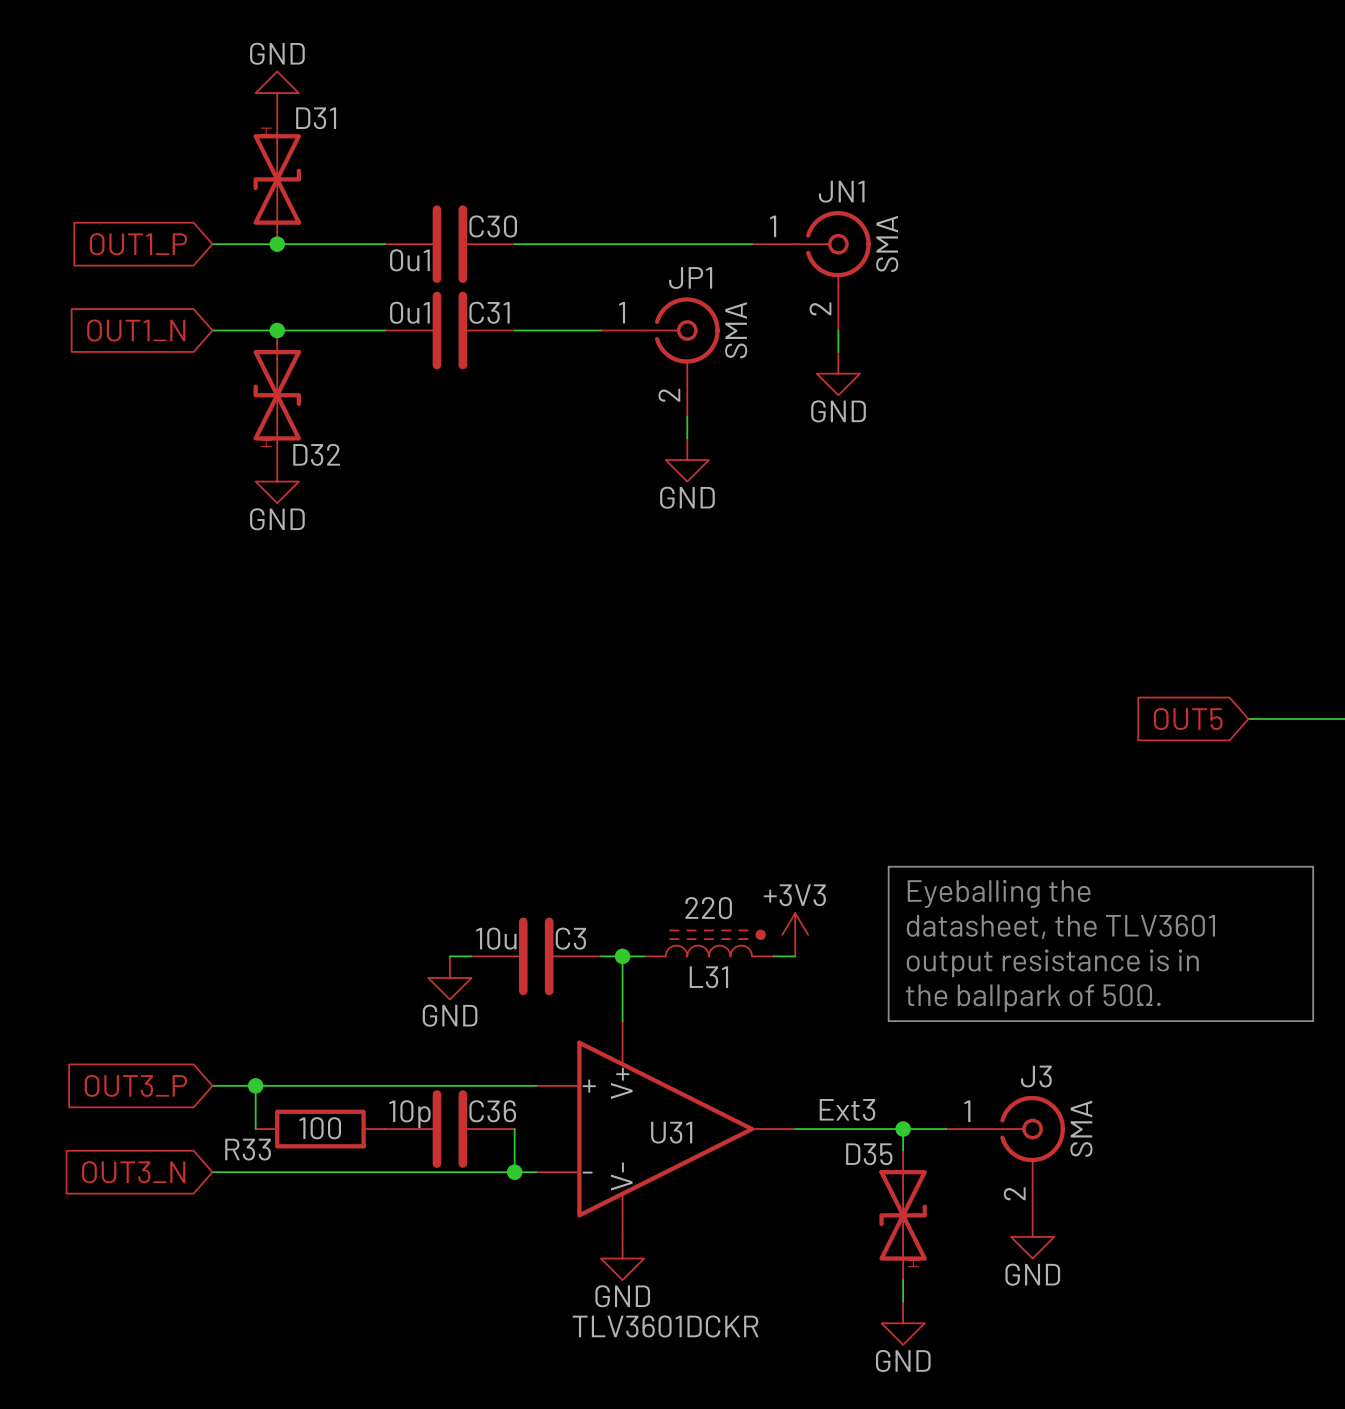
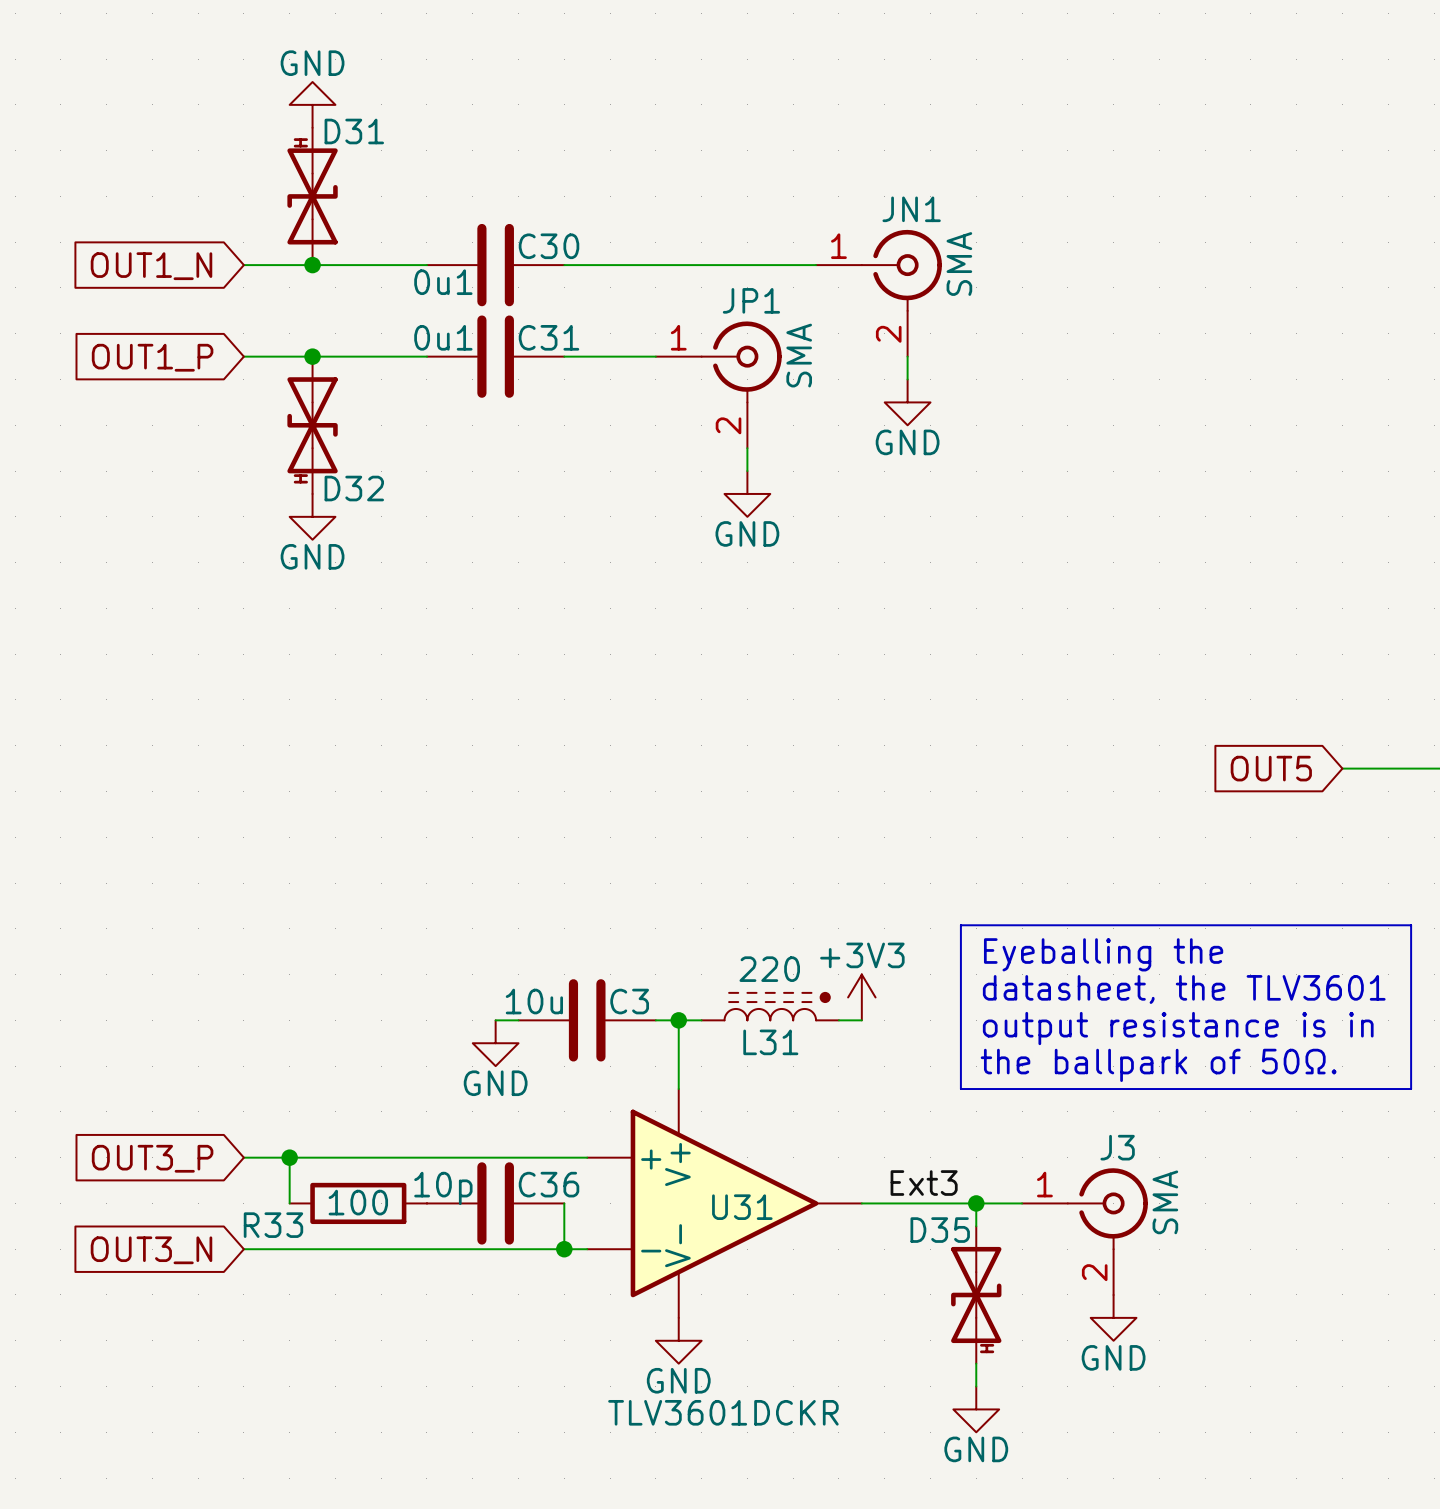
global label: OUT1_P (138, 244) -> OUT1_N (151, 266)
global label: OUT1_N (136, 330) -> OUT1_P (152, 357)

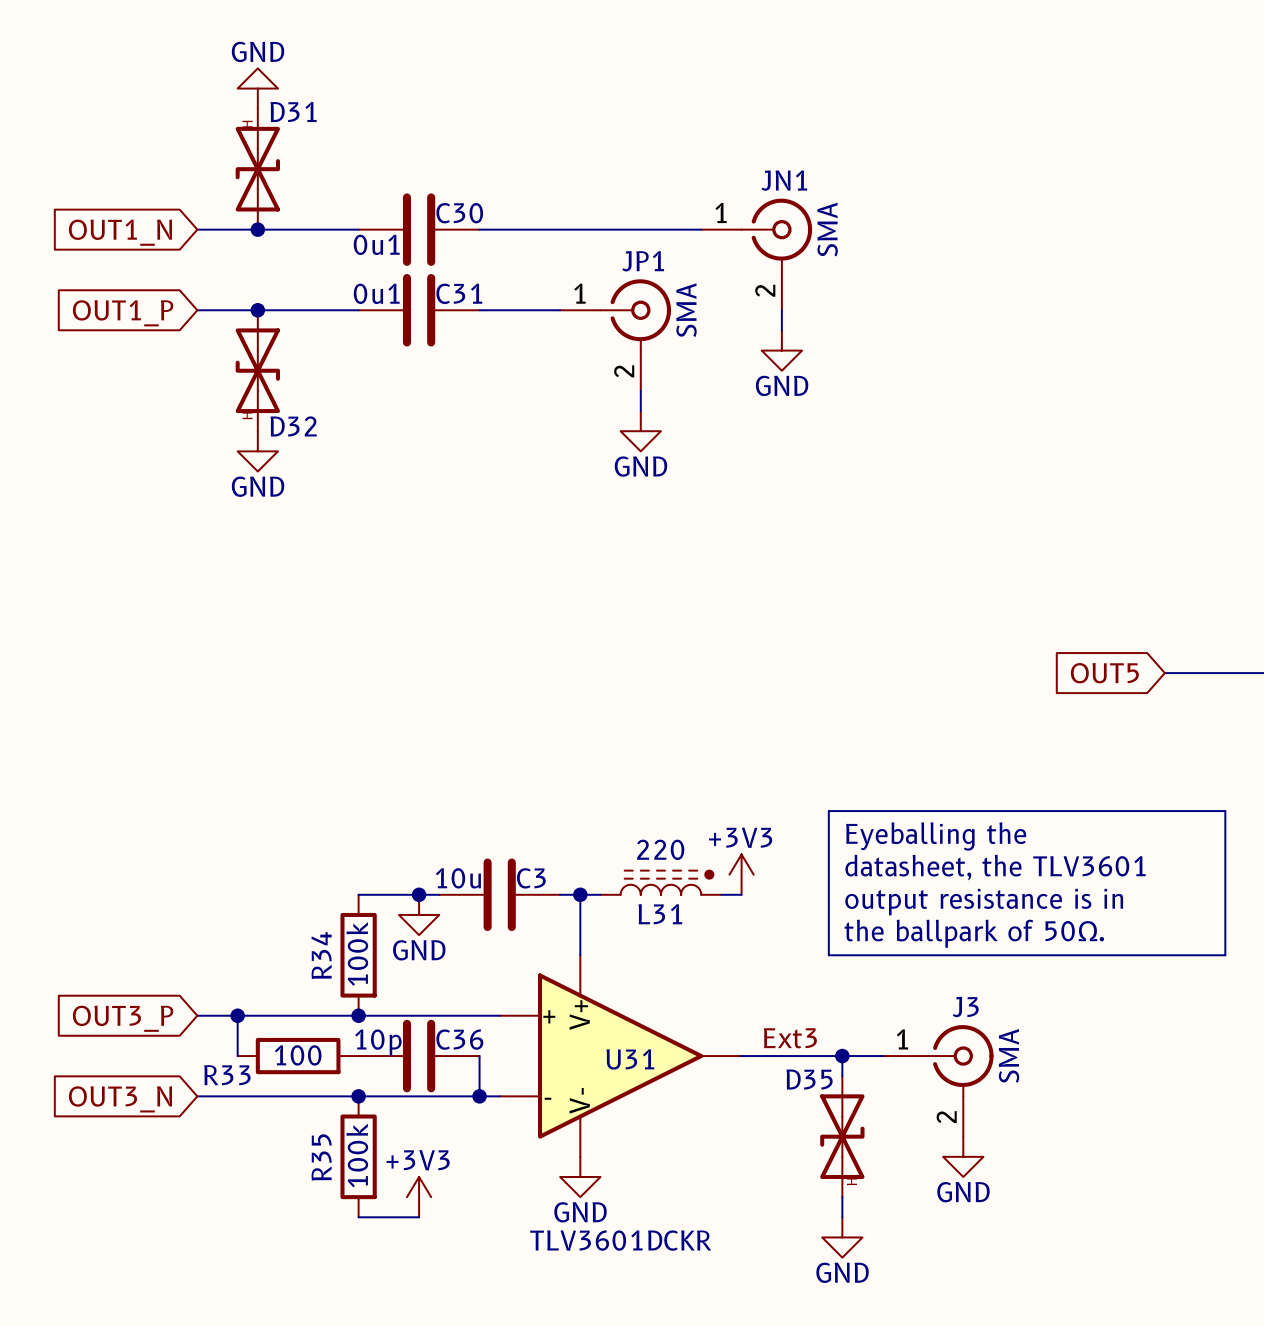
wire: none -> (358, 894) (419, 894)
junction: none -> (419, 894)
R34: none -> 100k (358, 955)
junction: none -> (358, 1015)
junction: none -> (358, 1096)
R35: none -> 100k (358, 1156)
power symbol: none -> +3V3 (419, 1197)
wire: none -> (358, 1217) (419, 1217)

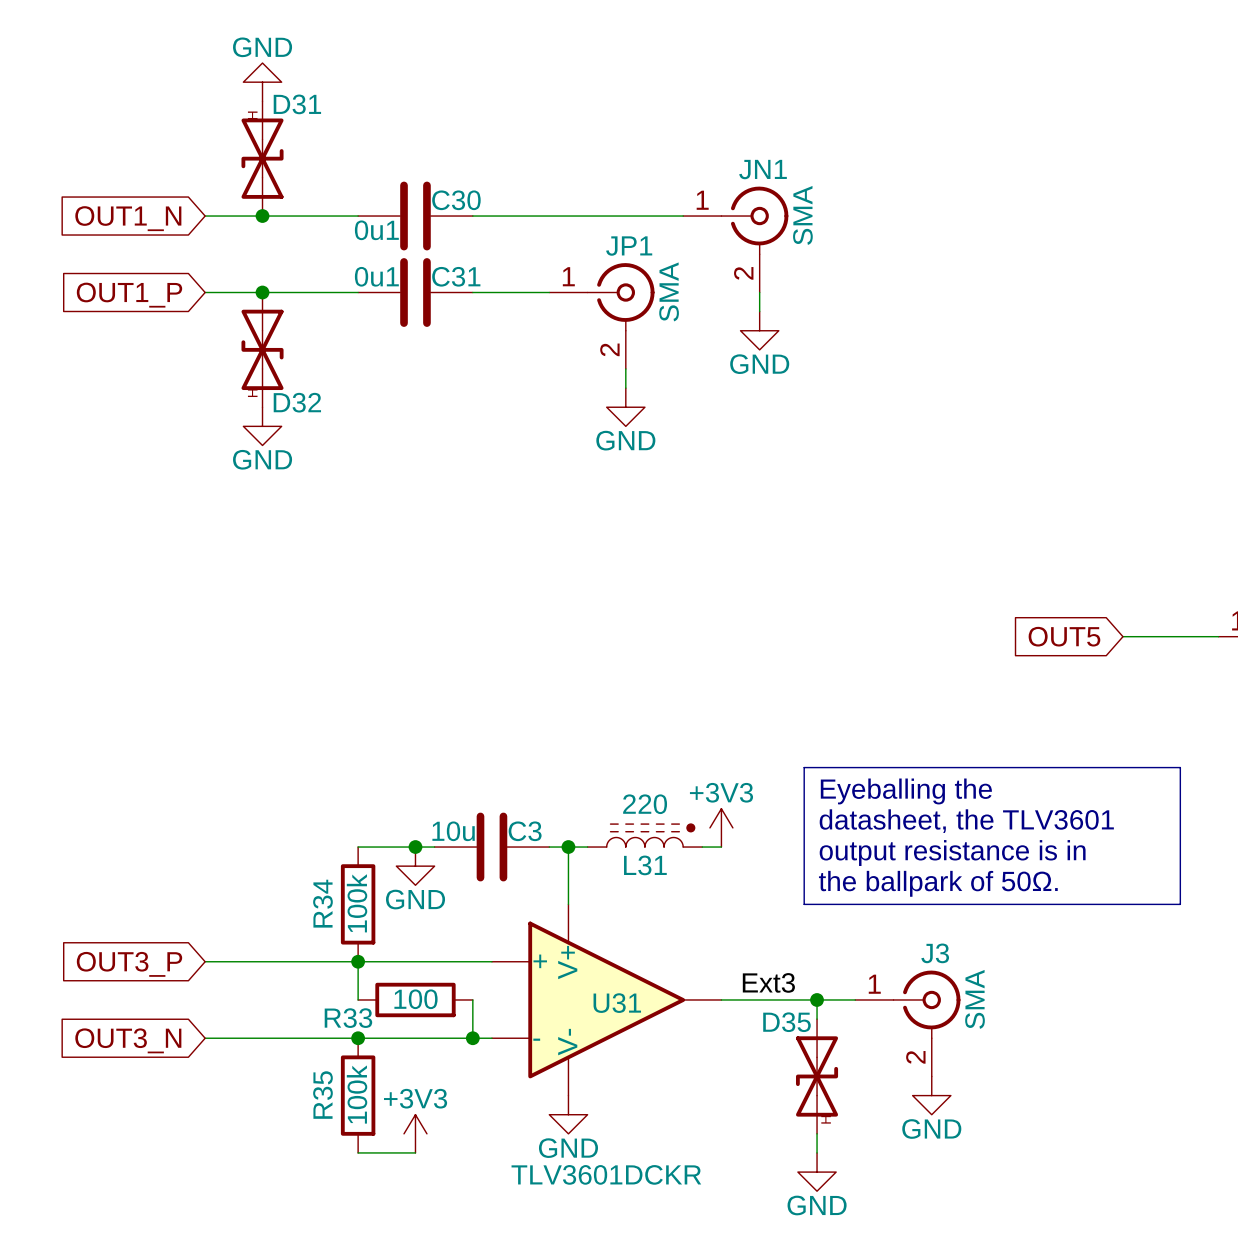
wire: (237, 1015) (237, 1056) -> (358, 961) (358, 999)
junction: (237, 1015) -> none
R33 position: (298, 1056) -> (415, 999)
C36: 10p (419, 1056) -> none

